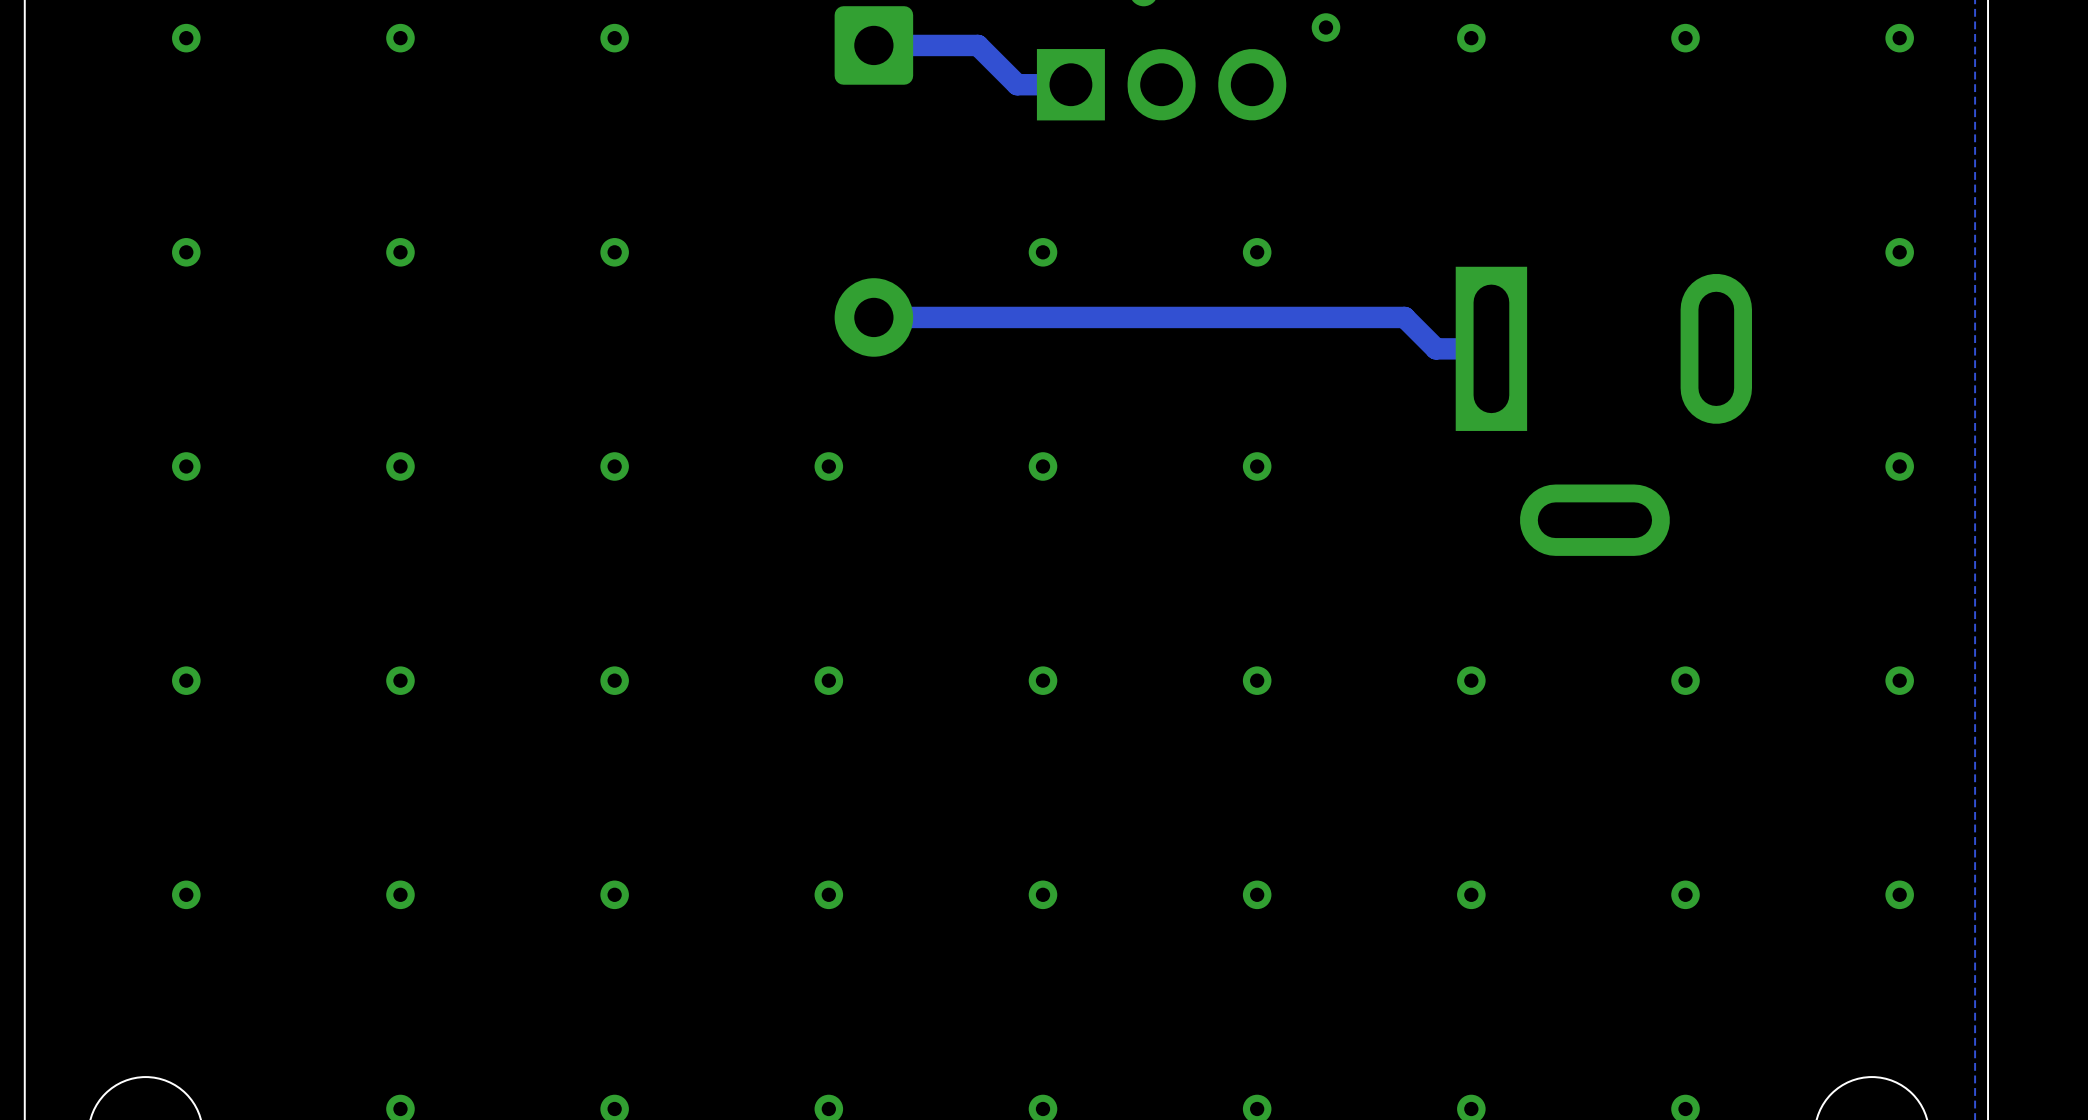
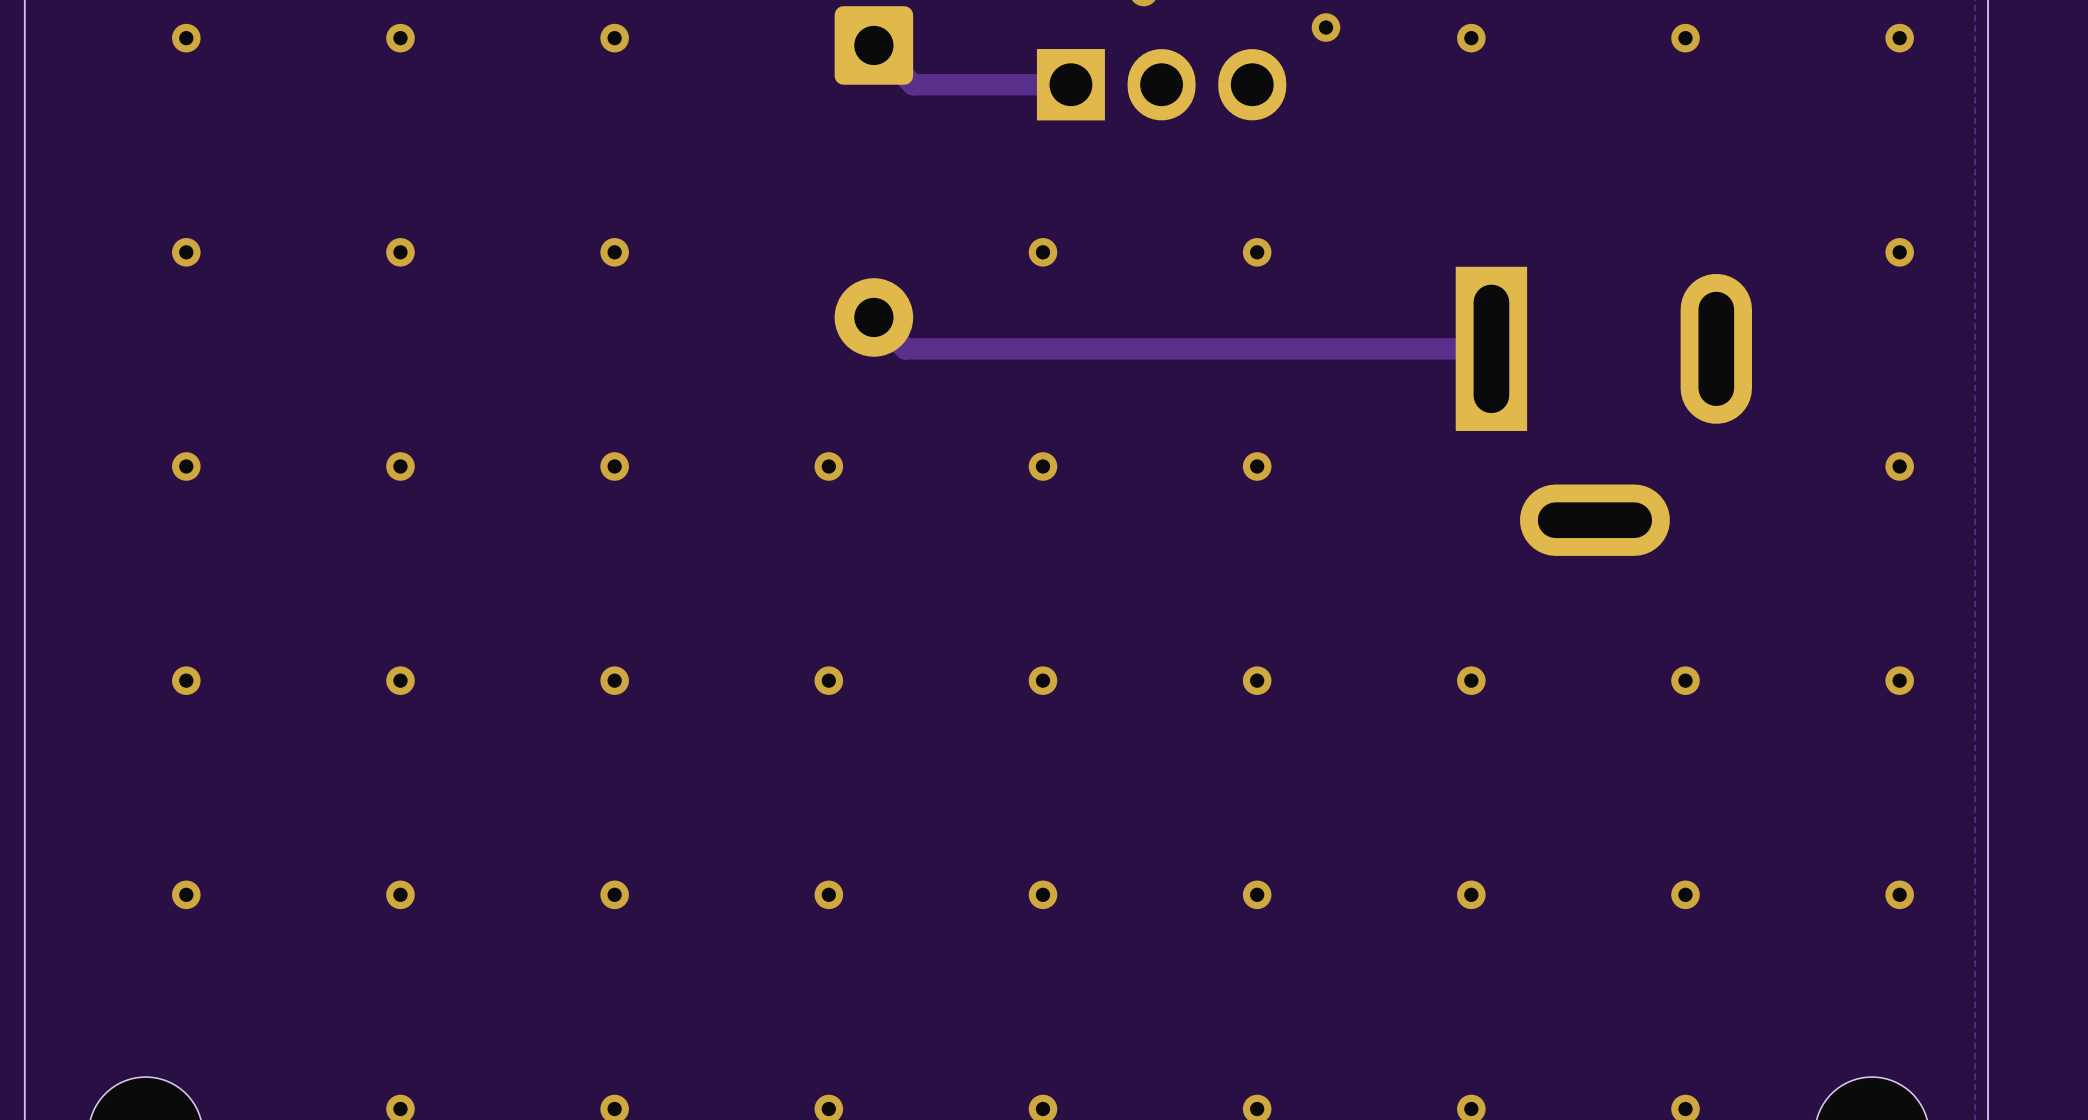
track: (873, 45) (977, 45) (1017, 84) -> (873, 45) (913, 84) (1017, 84)
track: (873, 317) (1404, 317) (1436, 348) -> (873, 317) (905, 348) (1436, 348)

